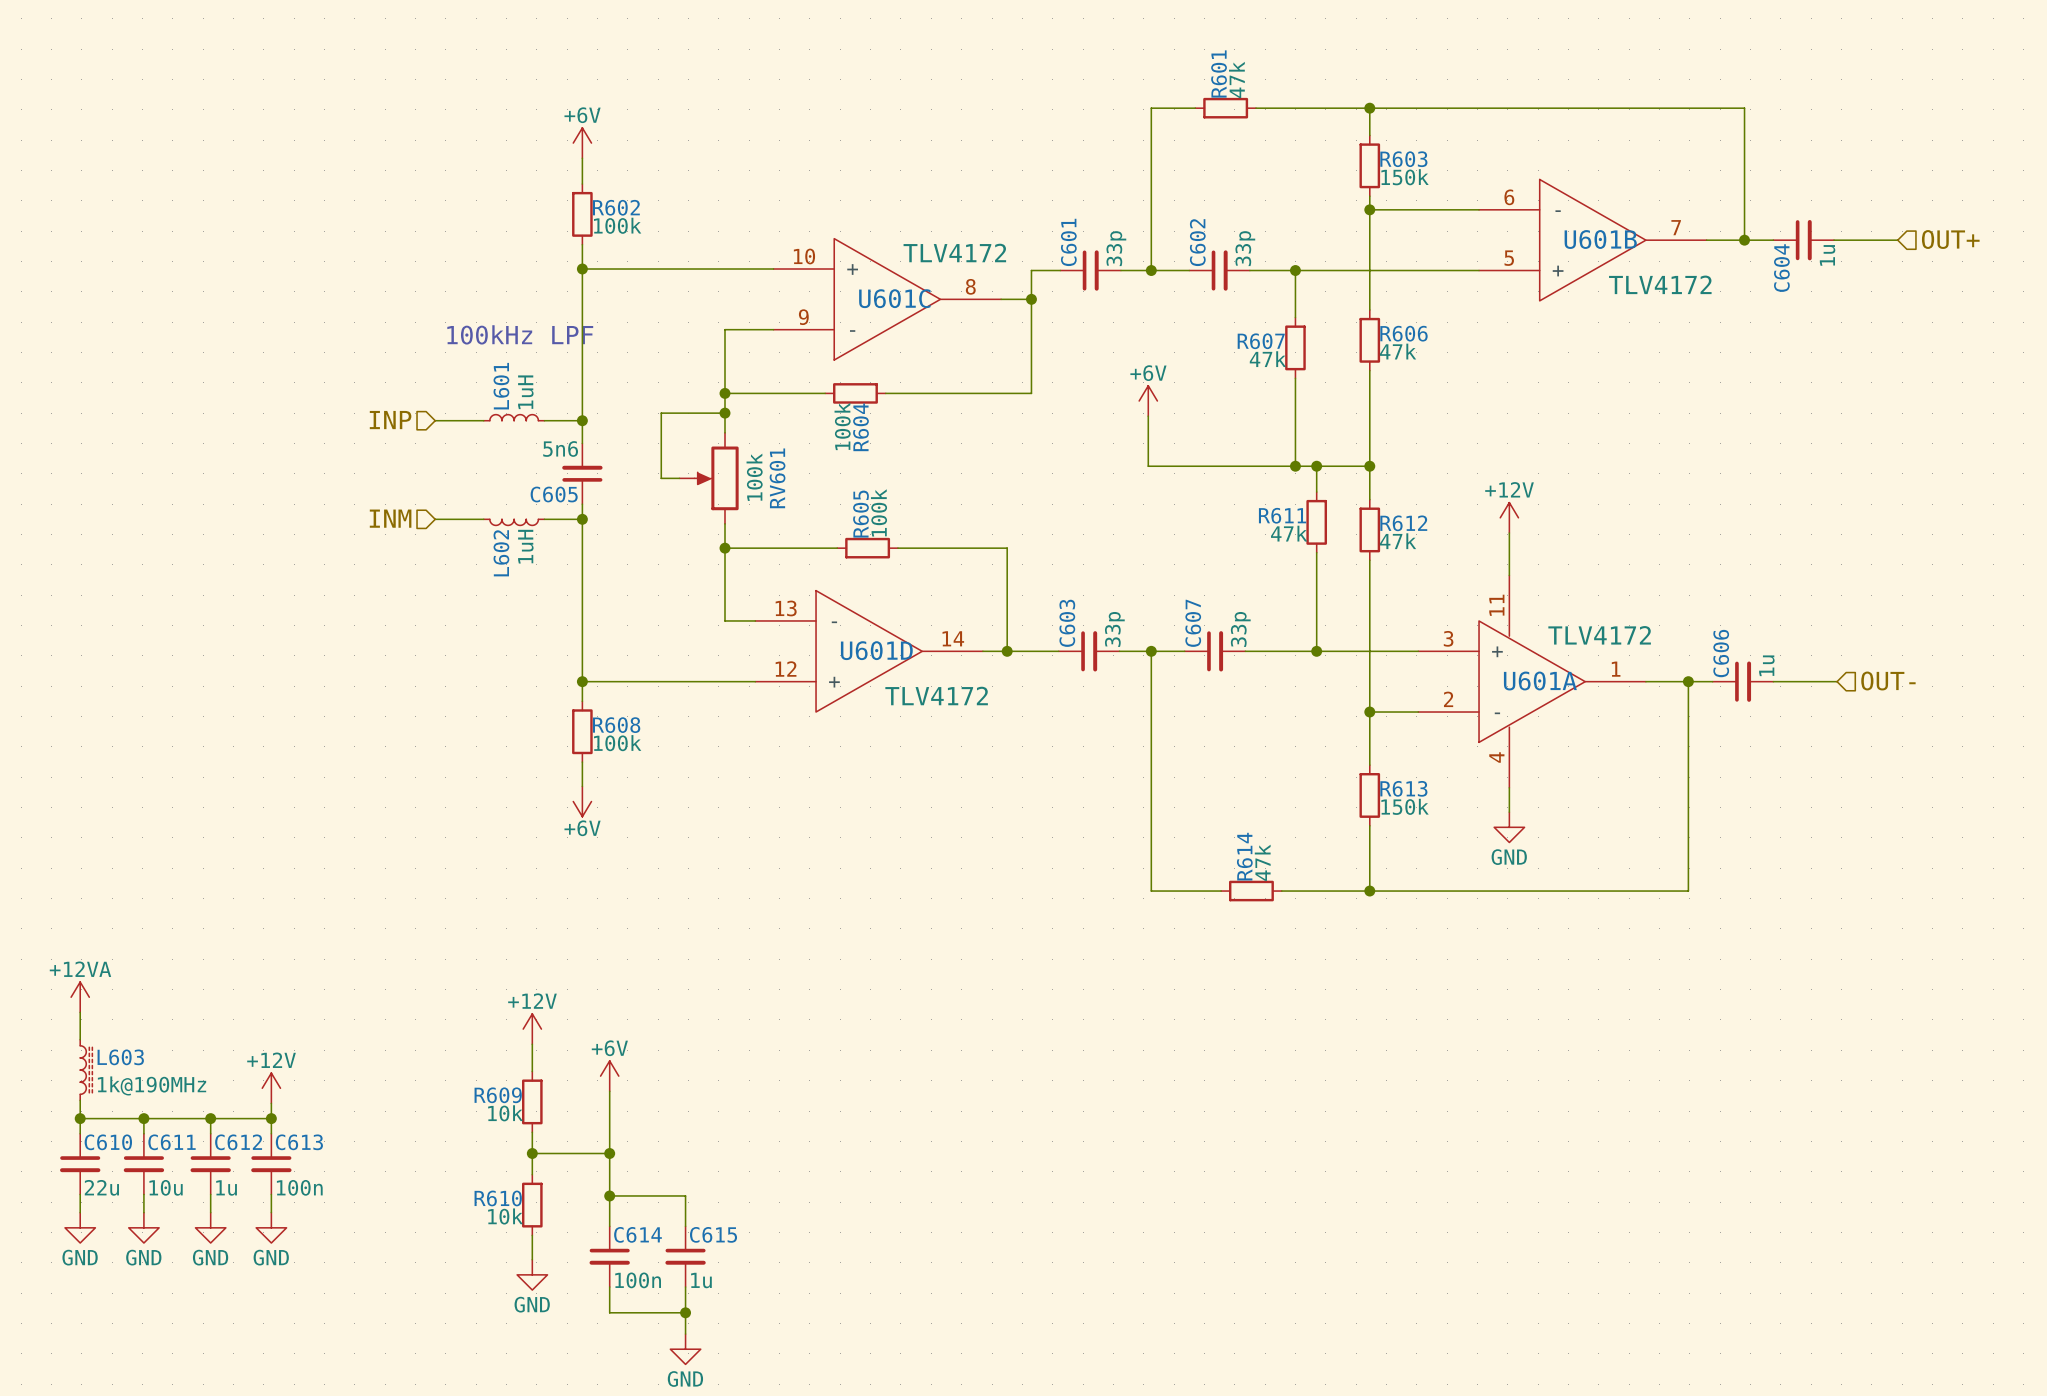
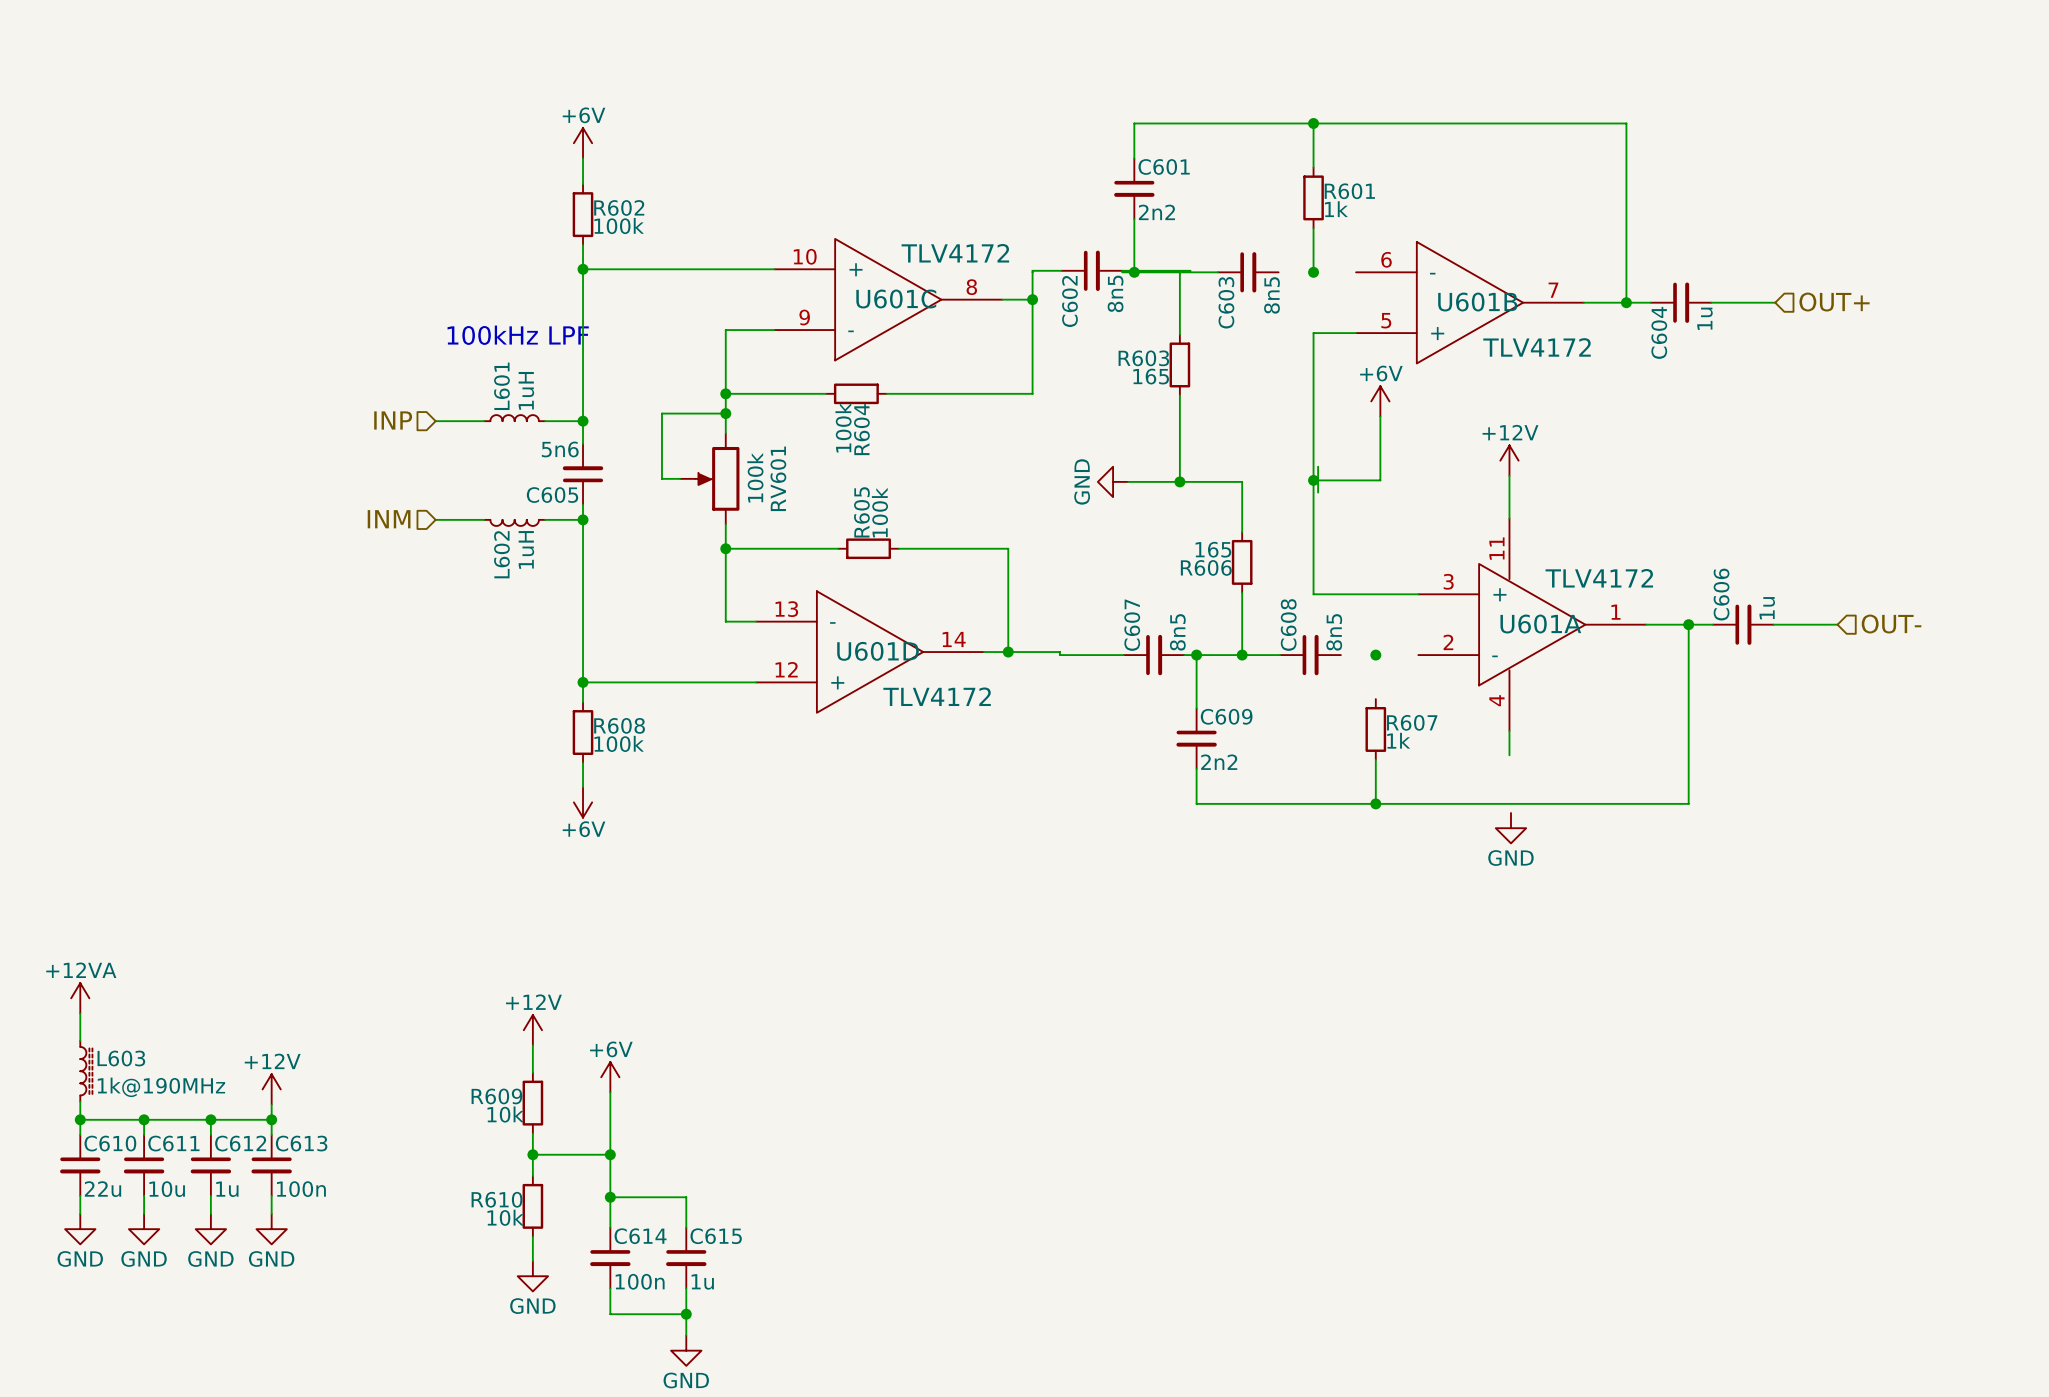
R601 value: 47k (1236, 79) -> 1k (1336, 209)
wire: (1195, 108) (1151, 108) (1151, 270) -> none
R601 rotation: 0° (1225, 108) -> 90° clockwise (1313, 197)
R601 position: (1225, 108) -> (1313, 197)
wire: (1256, 108) (1744, 108) (1744, 240) -> none
wire: (1369, 108) (1369, 135) -> none
junction: (1369, 108) -> none
wire: none -> (1313, 123) (1313, 167)
junction: none -> (1313, 123)
wire: none -> (1134, 158) (1134, 123) (1626, 123) (1626, 302)
R603 name position: R603 (1403, 159) -> R603 (1143, 358)
R603 position: (1369, 165) -> (1179, 364)
R603 value: 150k (1405, 177) -> 165 (1151, 376)
C601: none -> 2n2 (1134, 188)
wire: (1369, 196) (1369, 309) -> none
wire: (1369, 209) (1479, 209) -> none
junction: (1369, 209) -> none
wire: none -> (1134, 219) (1134, 272)
wire: none -> (1313, 228) (1313, 272)
hierarchical label position: OUT+ (1950, 239) -> OUT+ (1834, 302)
U601B position: (1592, 240) -> (1469, 302)
wire: (1706, 240) (1773, 240) -> (1583, 302) (1650, 302)
junction: (1744, 240) -> none
C604 position: (1803, 240) -> (1681, 302)
wire: (1834, 240) (1897, 240) -> (1711, 302) (1775, 302)
C601 name: C601 (1068, 242) -> C602 (1069, 301)
C601 value: 33p (1116, 248) -> 8n5 (1115, 293)
junction position: (1151, 270) -> (1134, 272)
C602: 33p (1219, 270) -> none
wire: (1249, 270) (1479, 270) -> none
wire: (1295, 270) (1295, 317) -> none
junction position: (1295, 270) -> (1313, 272)
wire: none -> (1122, 272) (1217, 272)
wire: none -> (1179, 272) (1179, 334)
junction: none -> (1626, 302)
wire: none -> (1356, 333) (1313, 333) (1313, 594) (1418, 594)
R606 name position: R606 (1404, 333) -> R606 (1206, 567)
R606 position: (1369, 340) -> (1242, 562)
R607 name position: R607 (1261, 341) -> R607 (1412, 722)
R607 position: (1295, 347) -> (1375, 729)
R606 value: 47k (1398, 351) -> 165 (1213, 549)
R607 value: 47k (1267, 359) -> 1k (1398, 740)
wire: (1369, 370) (1369, 499) -> none
wire: (1295, 378) (1295, 466) -> none
wire: none -> (1179, 395) (1179, 481)
power symbol position: +6V (1148, 400) -> +6V (1380, 401)
wire: (1148, 416) (1148, 466) (1369, 466) -> none
wire: none -> (1380, 416) (1380, 480) (1313, 480)
junction: (1295, 466) -> none
junction: (1316, 466) -> none
junction: (1369, 466) -> none
junction: none -> (1313, 480)
power symbol: none -> GND (1113, 481)
wire: none -> (1128, 481) (1242, 481) (1242, 532)
junction: none -> (1179, 481)
power symbol position: +12V (1509, 517) -> +12V (1509, 460)
R611: 47k (1316, 522) -> none
R612: 47k (1369, 529) -> none
wire: (1509, 532) (1509, 575) -> (1509, 475) (1509, 518)
wire: (1316, 552) (1316, 651) -> none
wire: (1369, 560) (1369, 765) -> none
wire: none -> (1242, 592) (1242, 655)
C603 name position: C603 (1067, 623) -> C603 (1226, 302)
wire: none -> (1688, 624) (1688, 803) (1196, 803) (1196, 768)
C603 value: 33p (1114, 629) -> 8n5 (1271, 295)
C607 value: 33p (1240, 629) -> 8n5 (1177, 632)
wire: none -> (1059, 652) (1059, 655) (1123, 655)
C603 position: (1089, 651) -> (1248, 272)
wire: (1119, 651) (1184, 651) -> none
wire: (1151, 651) (1151, 891) (1221, 891) -> none
junction position: (1151, 651) -> (1196, 655)
C607 position: (1215, 651) -> (1154, 655)
wire: (1245, 651) (1418, 651) -> none
junction: (1316, 651) -> none
wire: none -> (1184, 655) (1280, 655)
wire: none -> (1196, 655) (1196, 708)
junction: none -> (1242, 655)
C608: none -> 8n5 (1310, 655)
junction: none -> (1375, 655)
U601A position: (1532, 681) -> (1532, 624)
wire: (1645, 681) (1712, 681) -> (1646, 624) (1712, 624)
wire: (1688, 681) (1688, 891) (1281, 891) -> none
junction position: (1688, 681) -> (1688, 624)
C606 position: (1743, 681) -> (1743, 624)
wire: (1773, 681) (1837, 681) -> (1773, 624) (1837, 624)
hierarchical label position: OUT- (1888, 681) -> OUT- (1891, 624)
wire: (1369, 712) (1418, 712) -> none
junction: (1369, 712) -> none
C609: none -> 2n2 (1196, 738)
wire: none -> (1375, 759) (1375, 803)
wire: (1509, 787) (1509, 812) -> (1509, 731) (1509, 755)
R613: 150k (1369, 795) -> none
junction: none -> (1375, 803)
wire: (1369, 825) (1369, 891) -> none
R614: 47k (1251, 891) -> none
junction: (1369, 891) -> none

